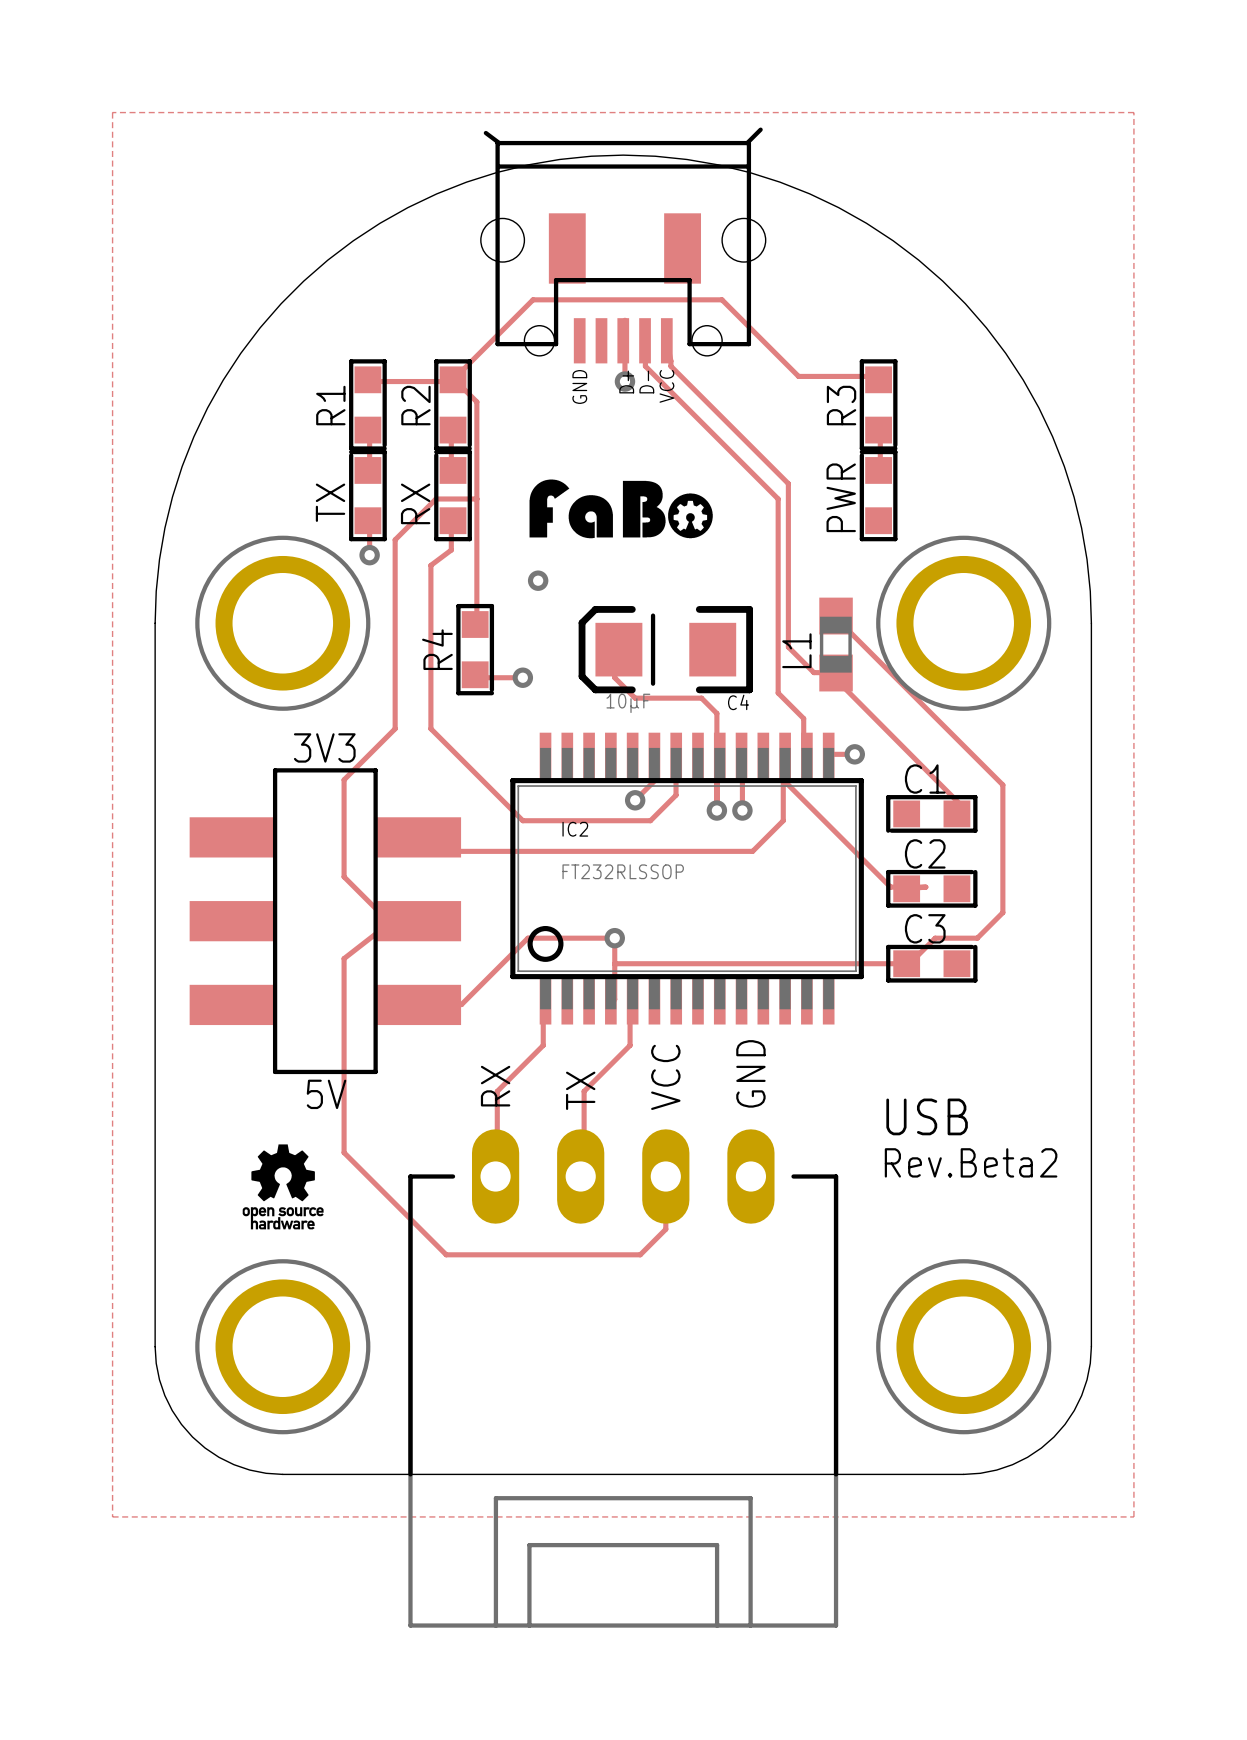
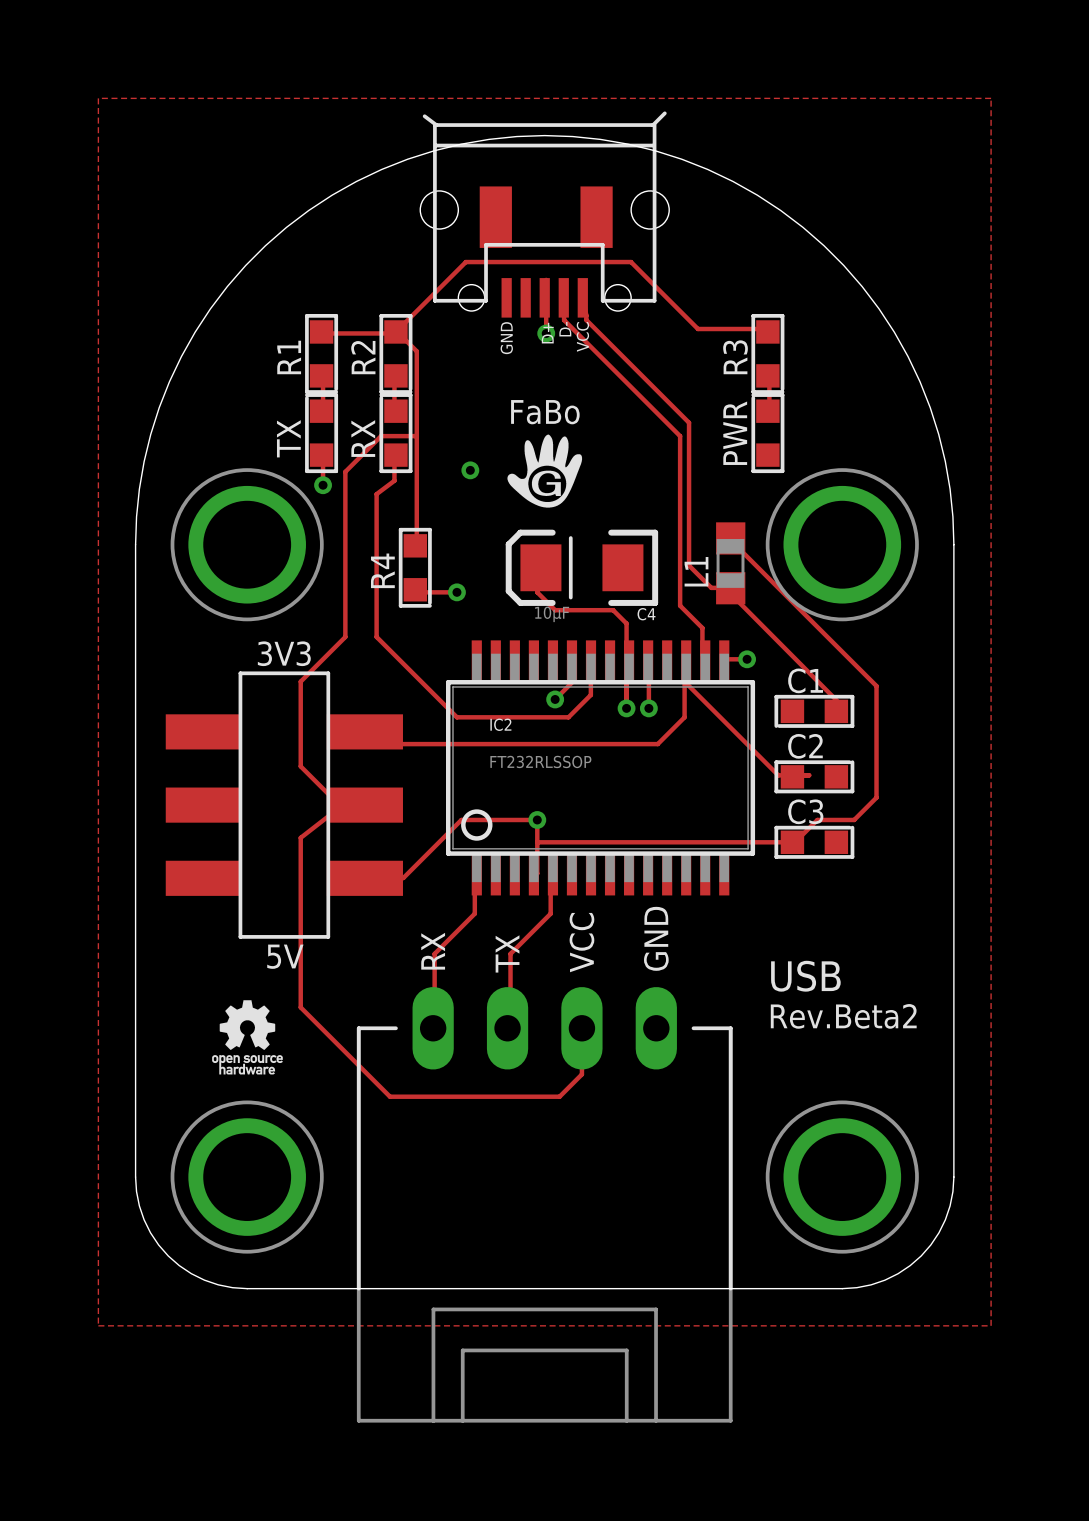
drawing shape: [529, 479, 713, 539] -> [507, 400, 583, 508]
via position: (538, 580) -> (470, 470)

